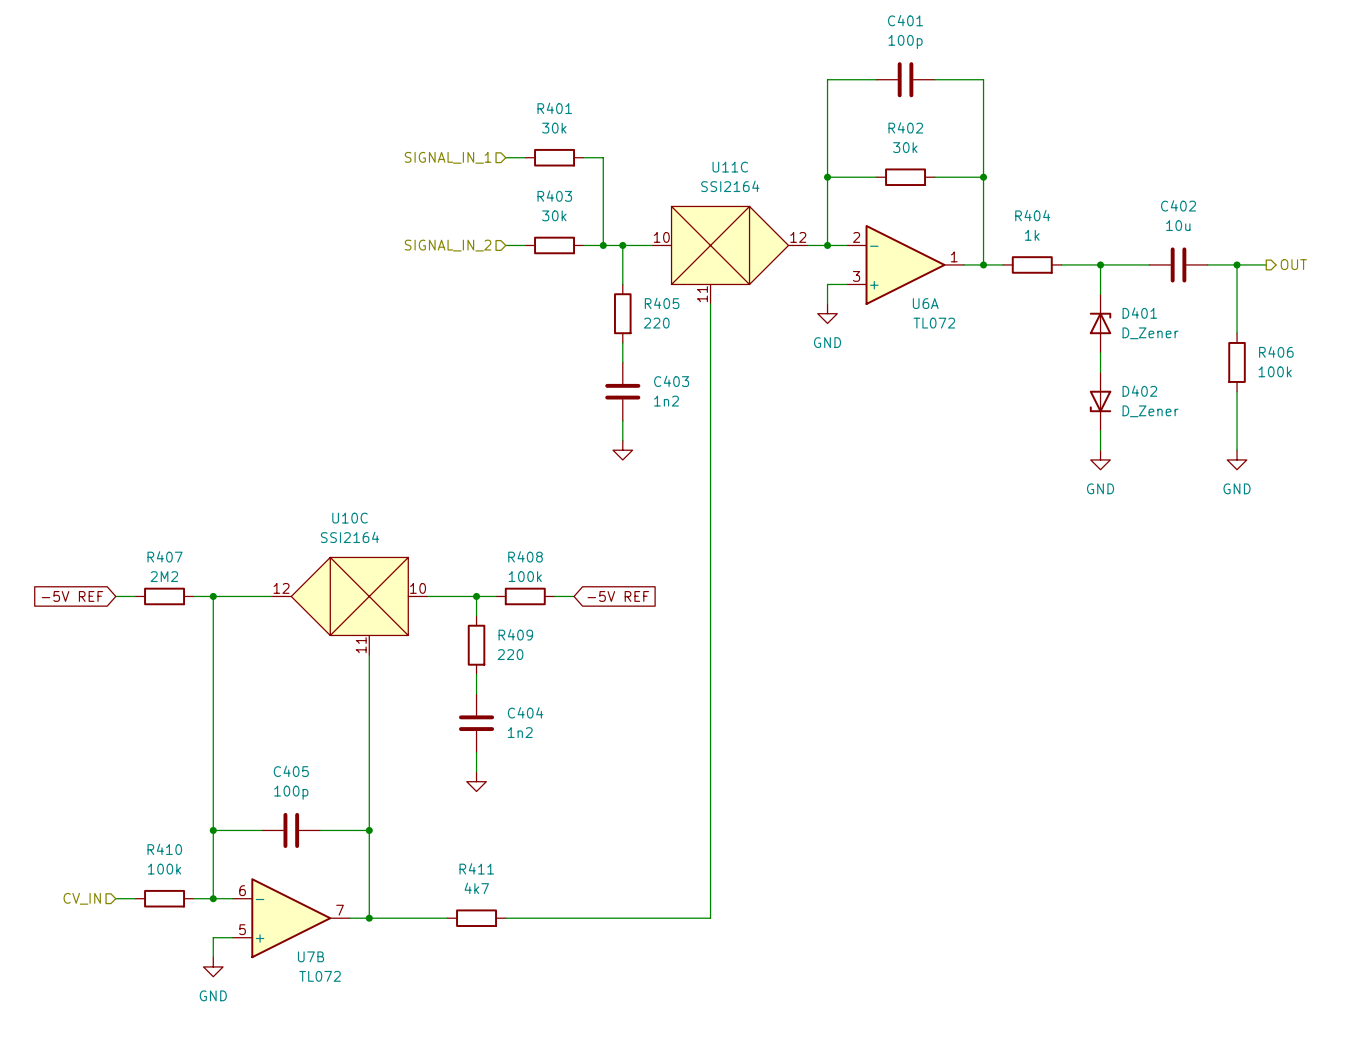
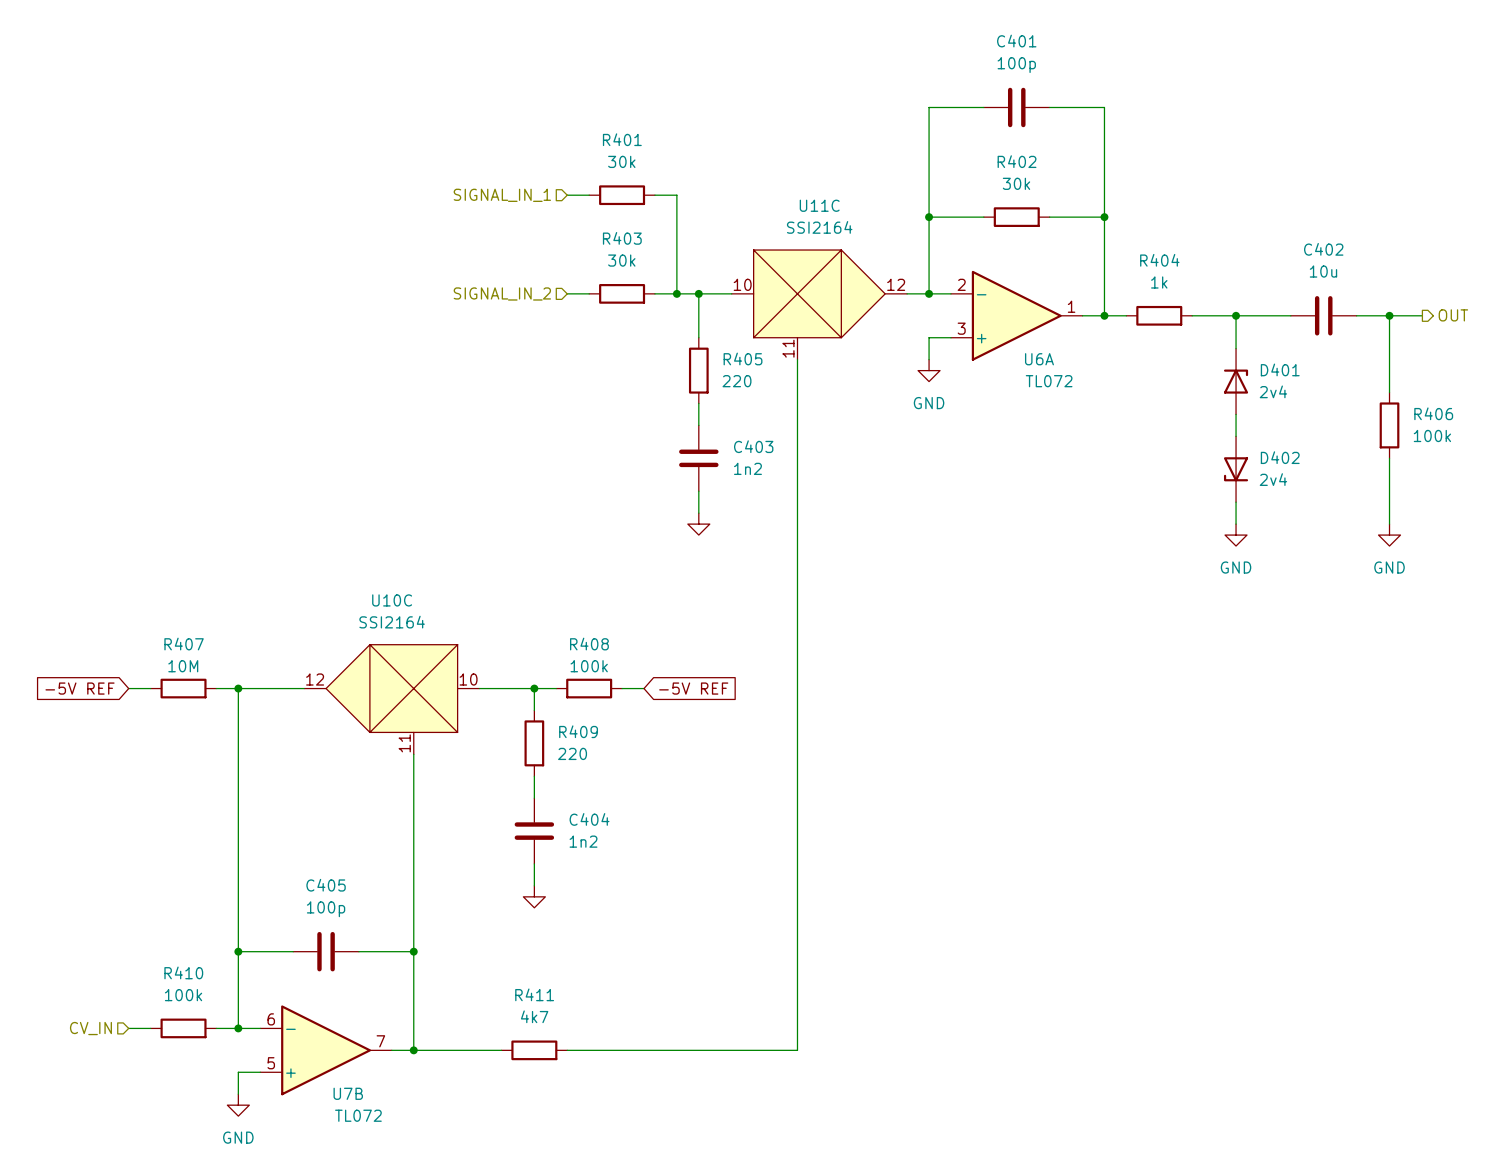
D401 value: D_Zener (1150, 333) -> 2v4 (1273, 391)
D402 value: D_Zener (1150, 411) -> 2v4 (1273, 479)
R407 value: 2M2 (164, 576) -> 10M (183, 666)

